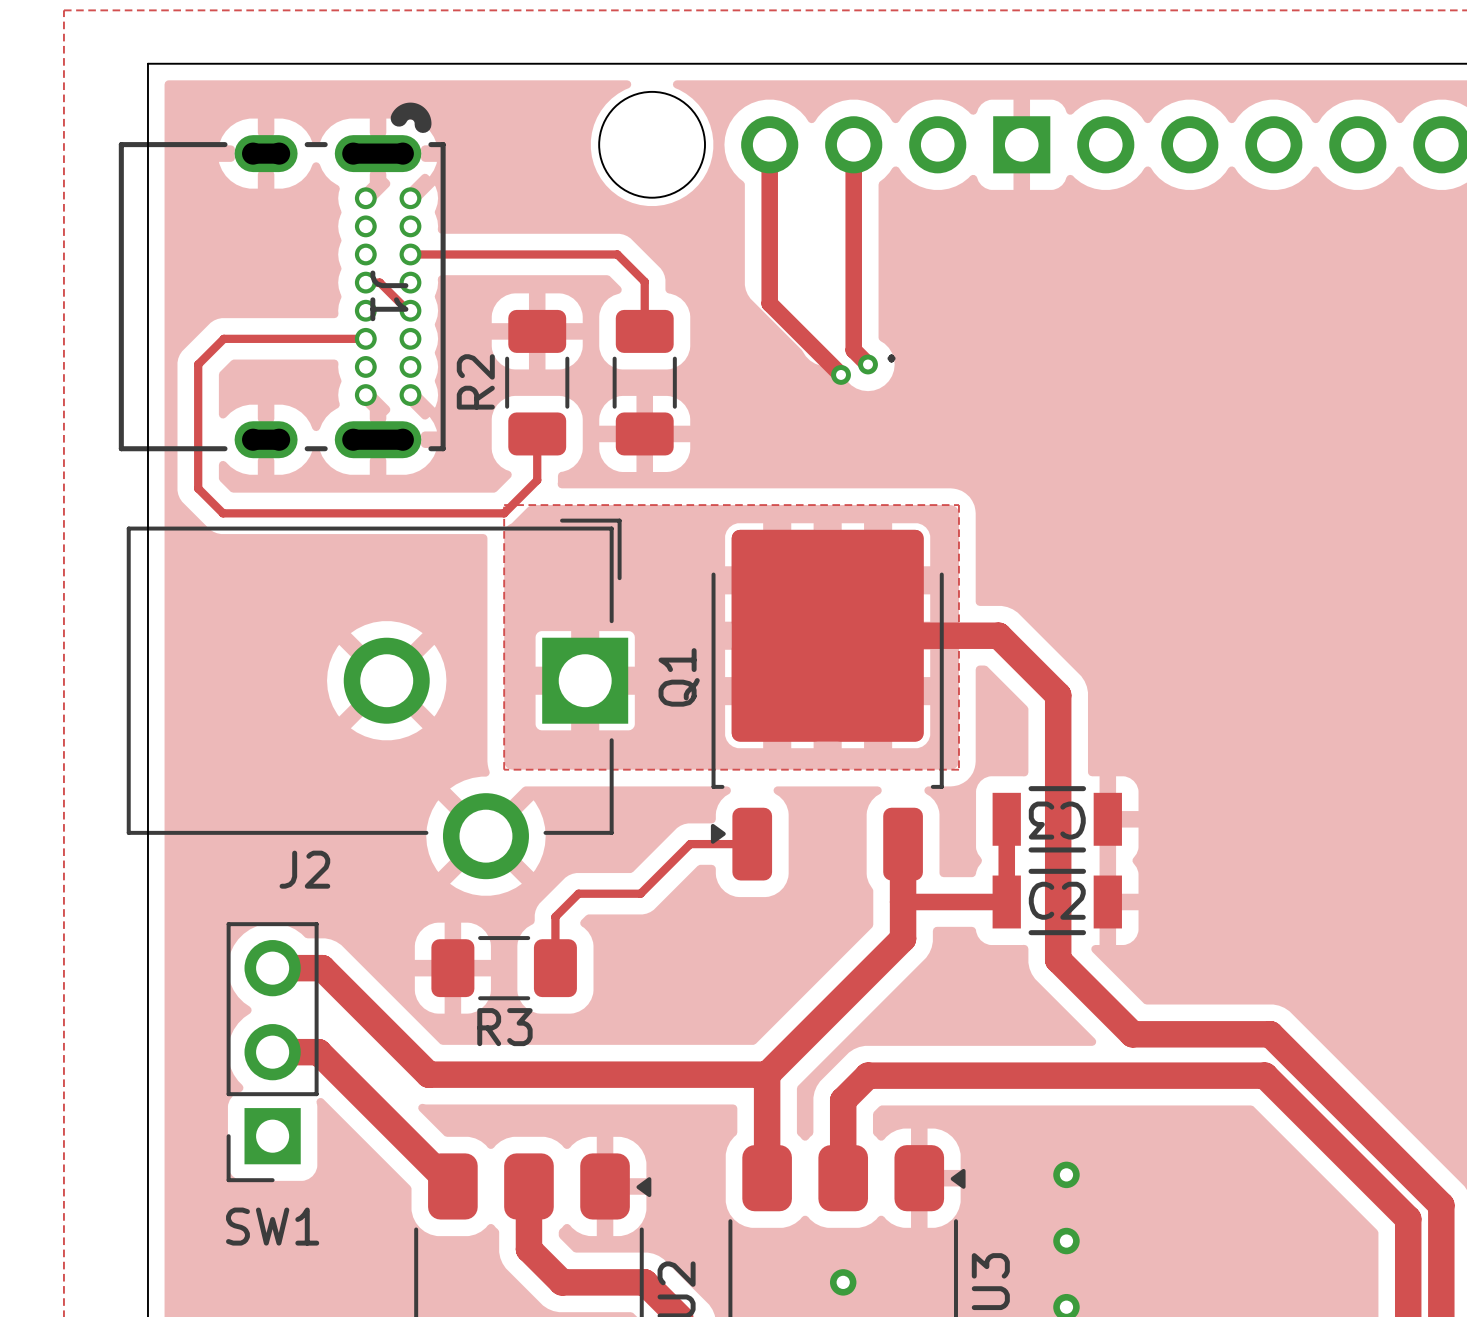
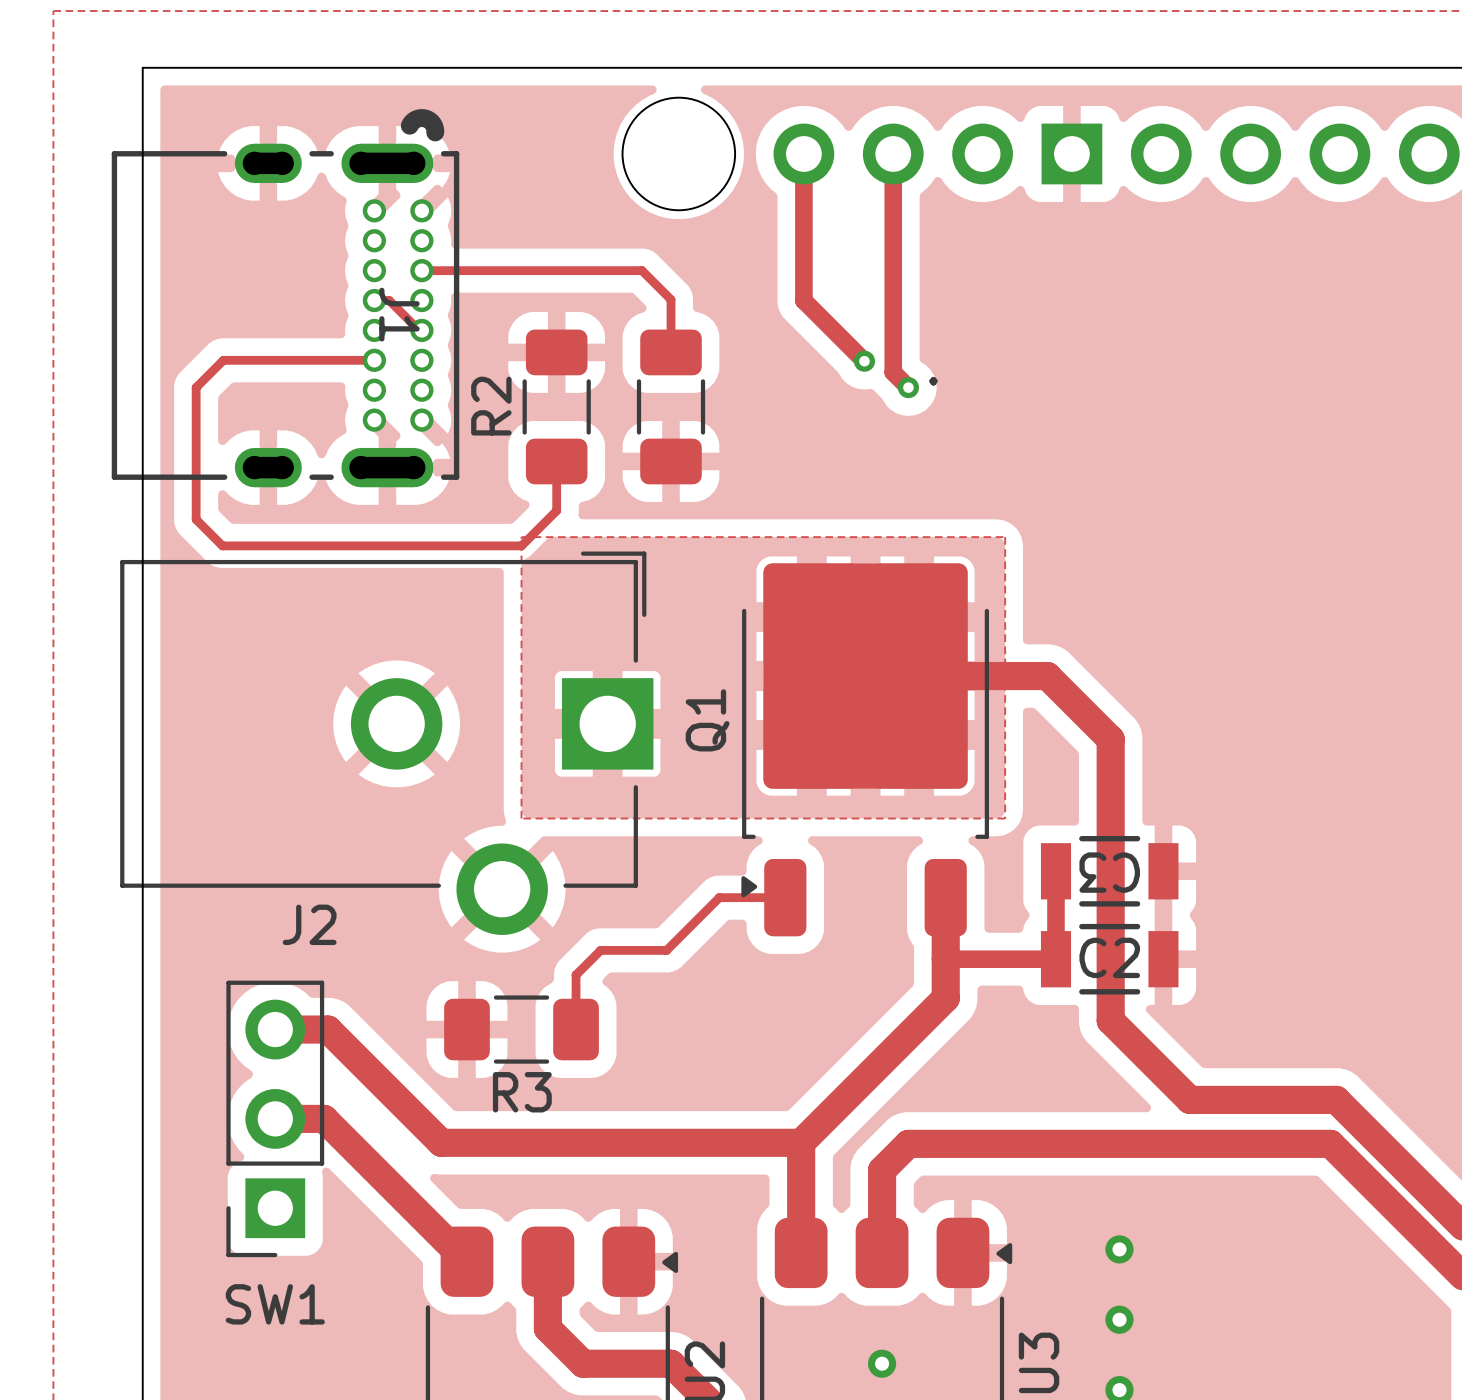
track: (769, 282) (769, 303) (841, 374) -> (803, 300) (864, 361)
via position: (841, 374) -> (864, 361)

